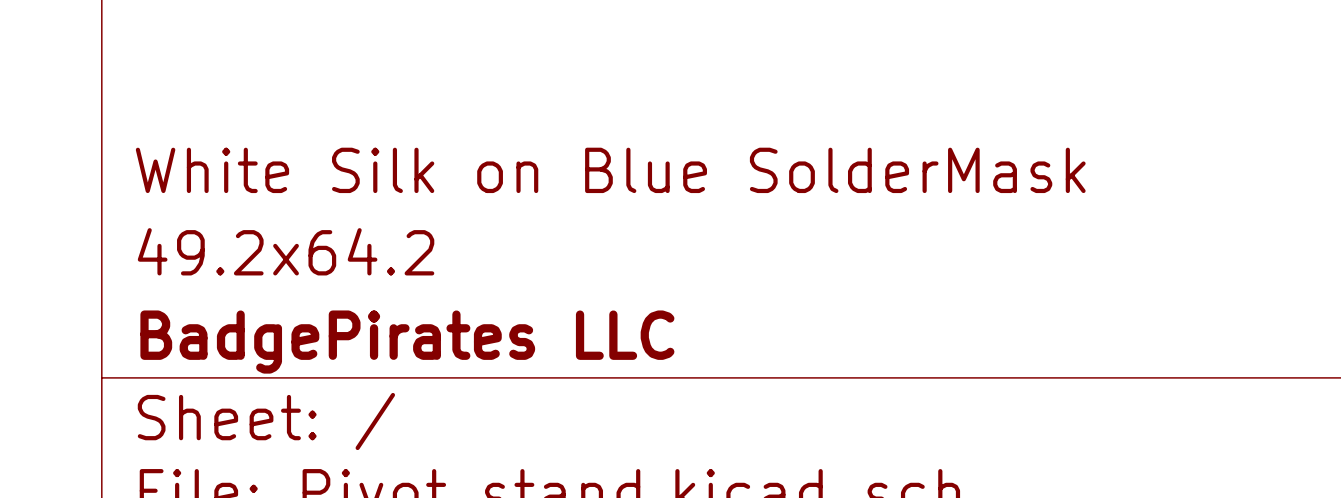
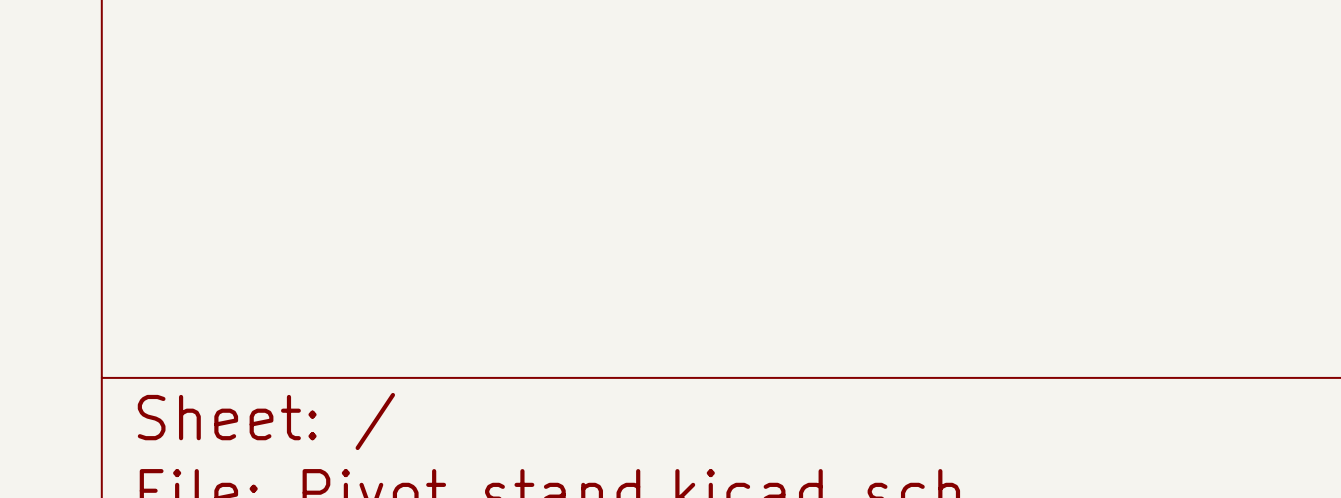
title block: White Silk on Blue SolderMask (610, 170) -> none
title block: 49.2x64.2 (286, 251) -> none
title block: BadgePirates LLC (407, 342) -> none

